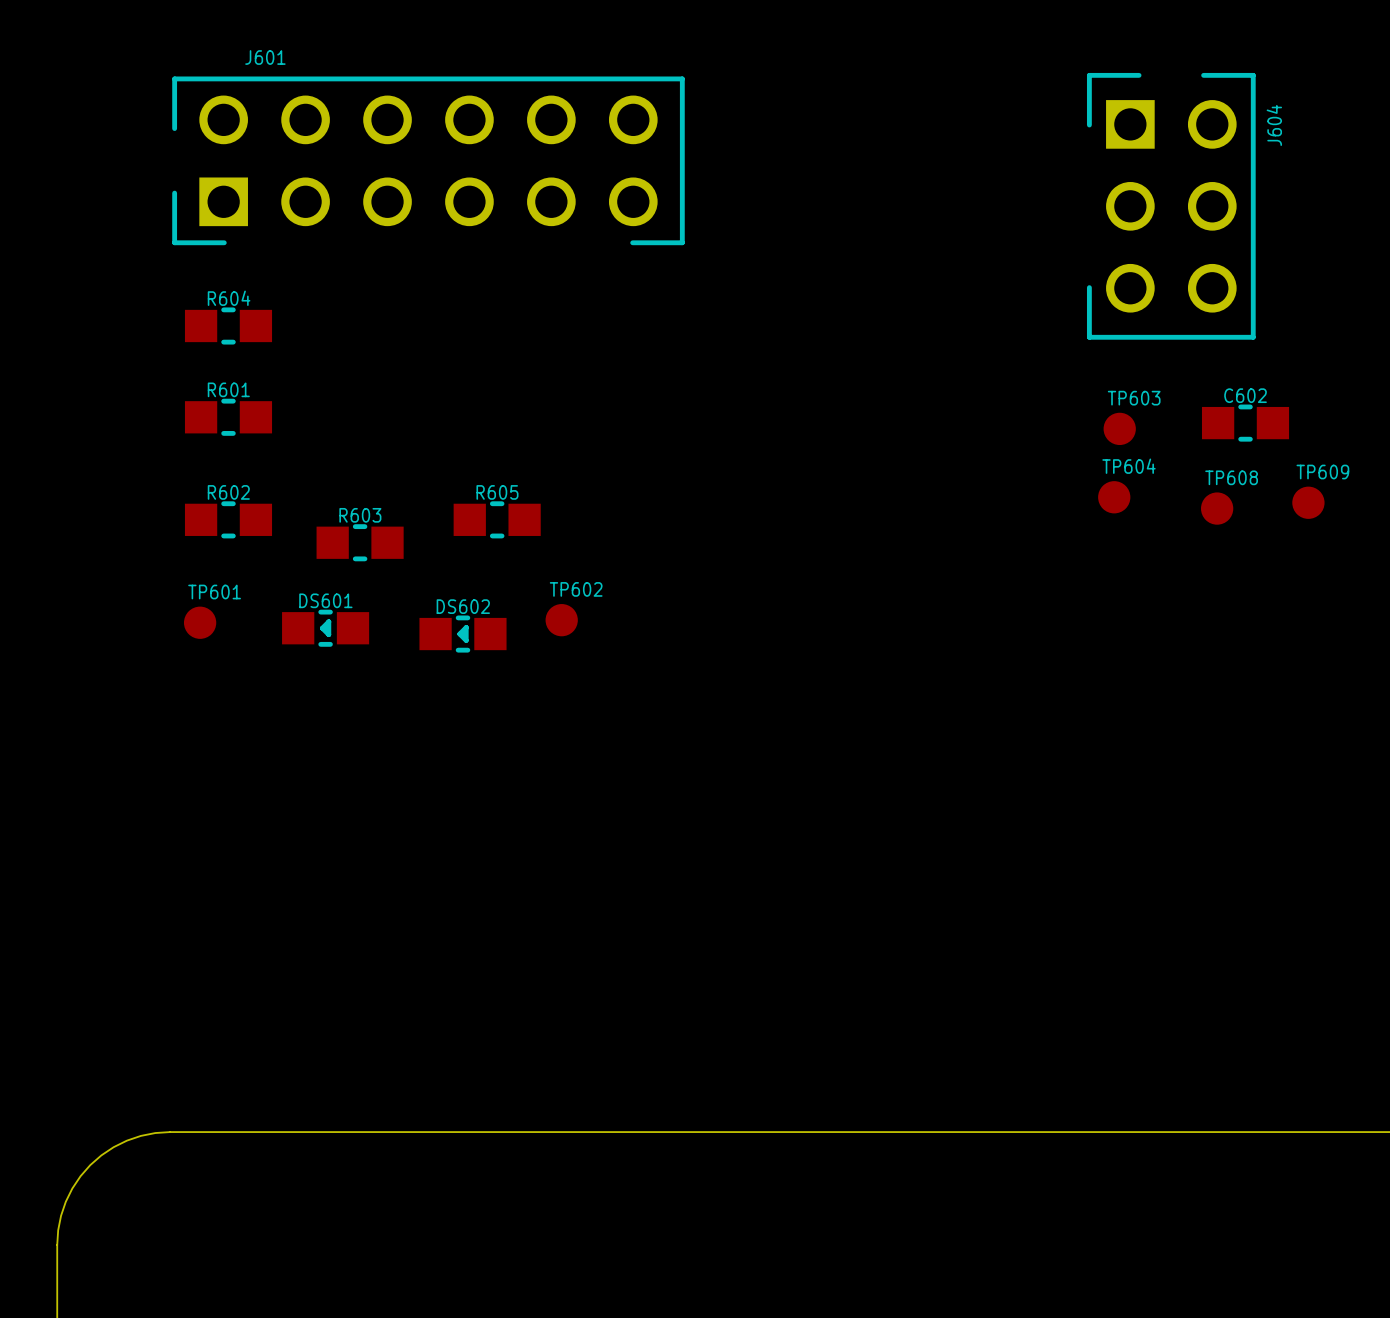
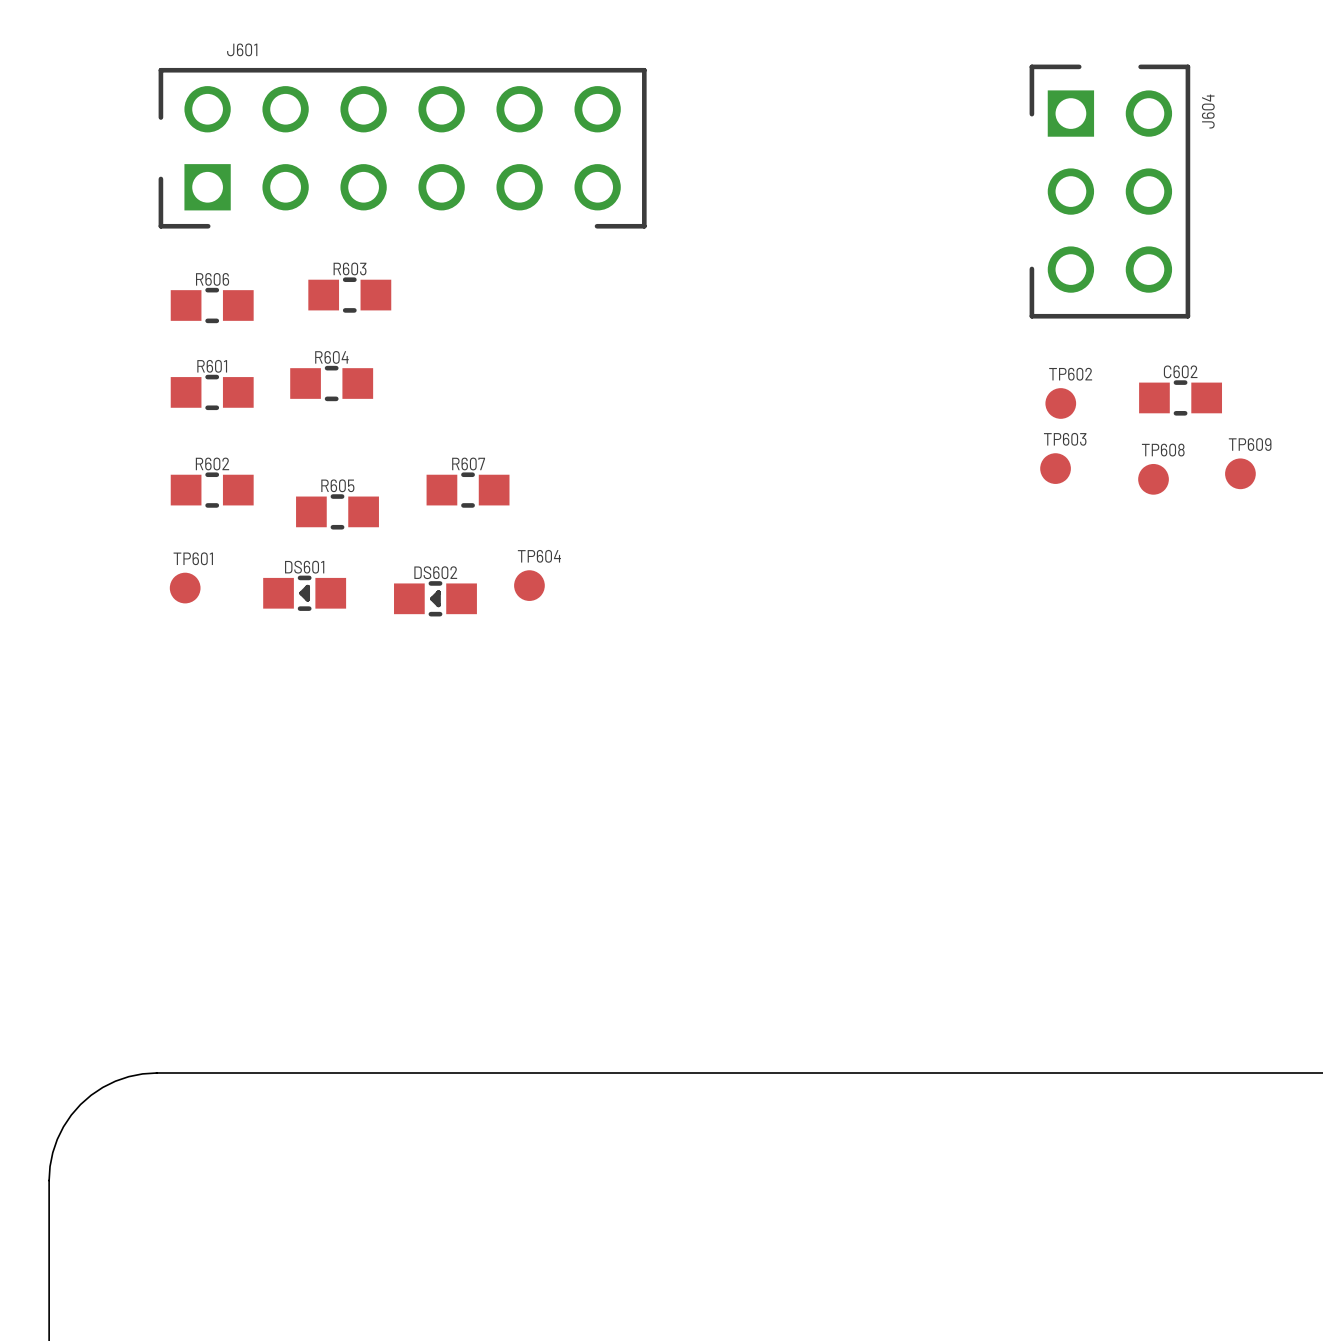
R604 name: R604 (229, 298) -> R606 (212, 279)
R603: none -> (349, 295)
TP603 name: TP603 (1134, 398) -> TP602 (1070, 374)
R604: none -> (331, 383)
TP604 name: TP604 (1128, 466) -> TP603 (1065, 439)
R605 name: R605 (497, 492) -> R607 (468, 463)
R603 name: R603 (360, 515) -> R605 (337, 485)
TP602 name: TP602 (576, 589) -> TP604 (539, 556)

